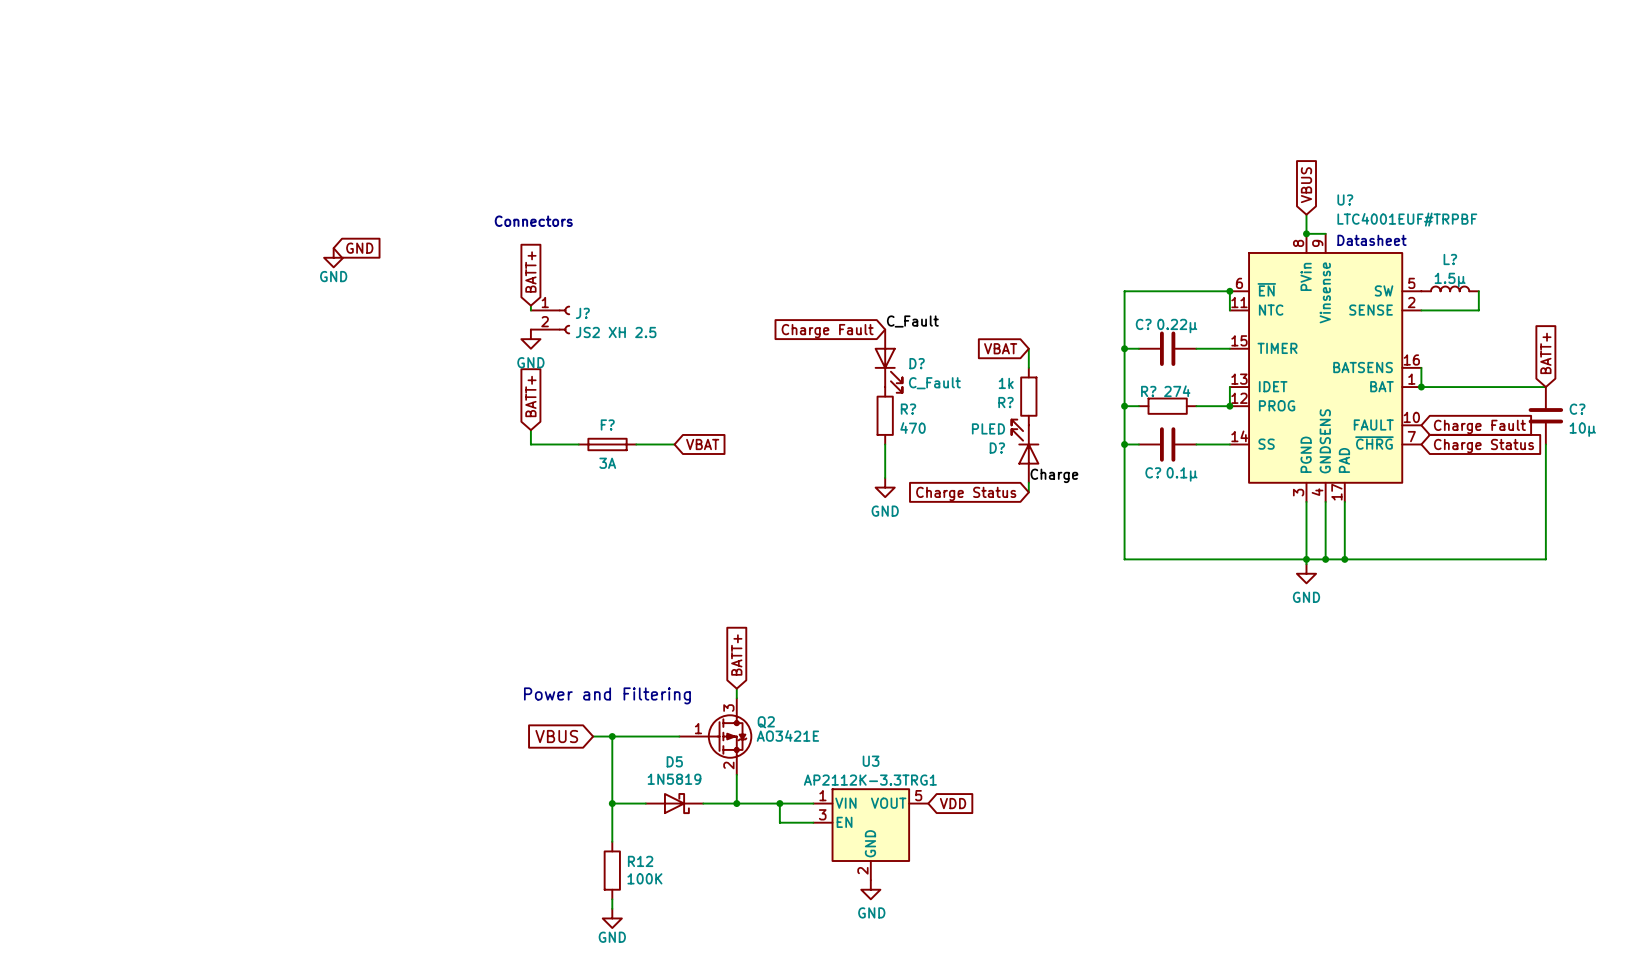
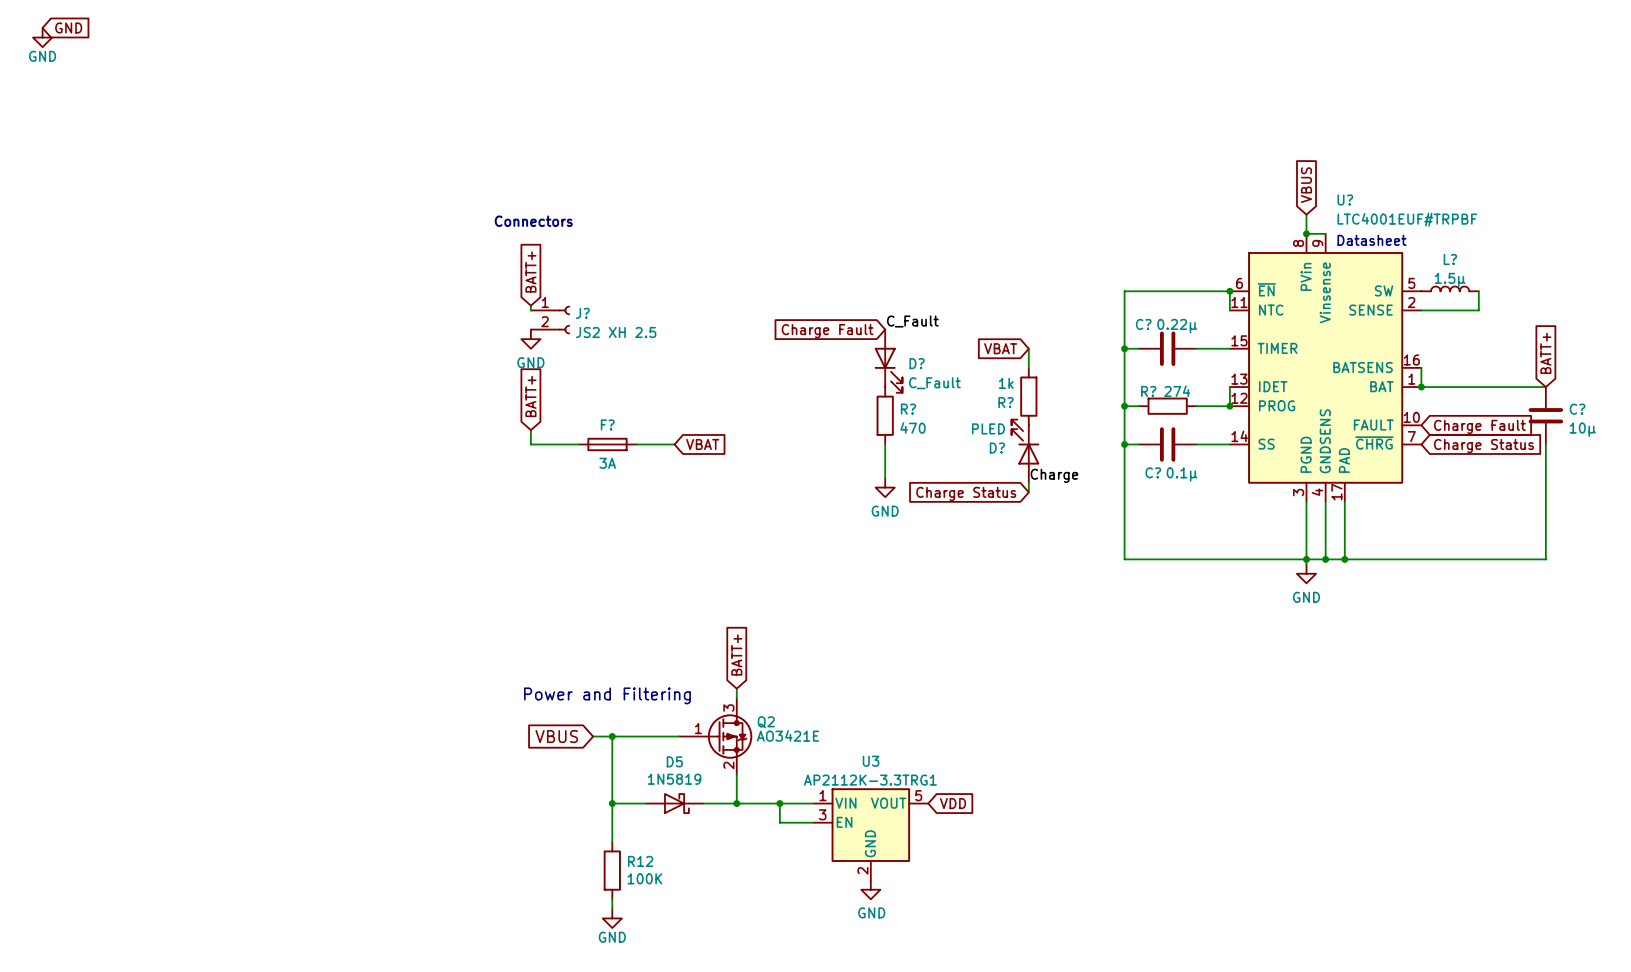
global label: none -> GND (68, 27)
power symbol: none -> GND (42, 37)
global label: GND (359, 248) -> none
power symbol: GND (333, 257) -> none

